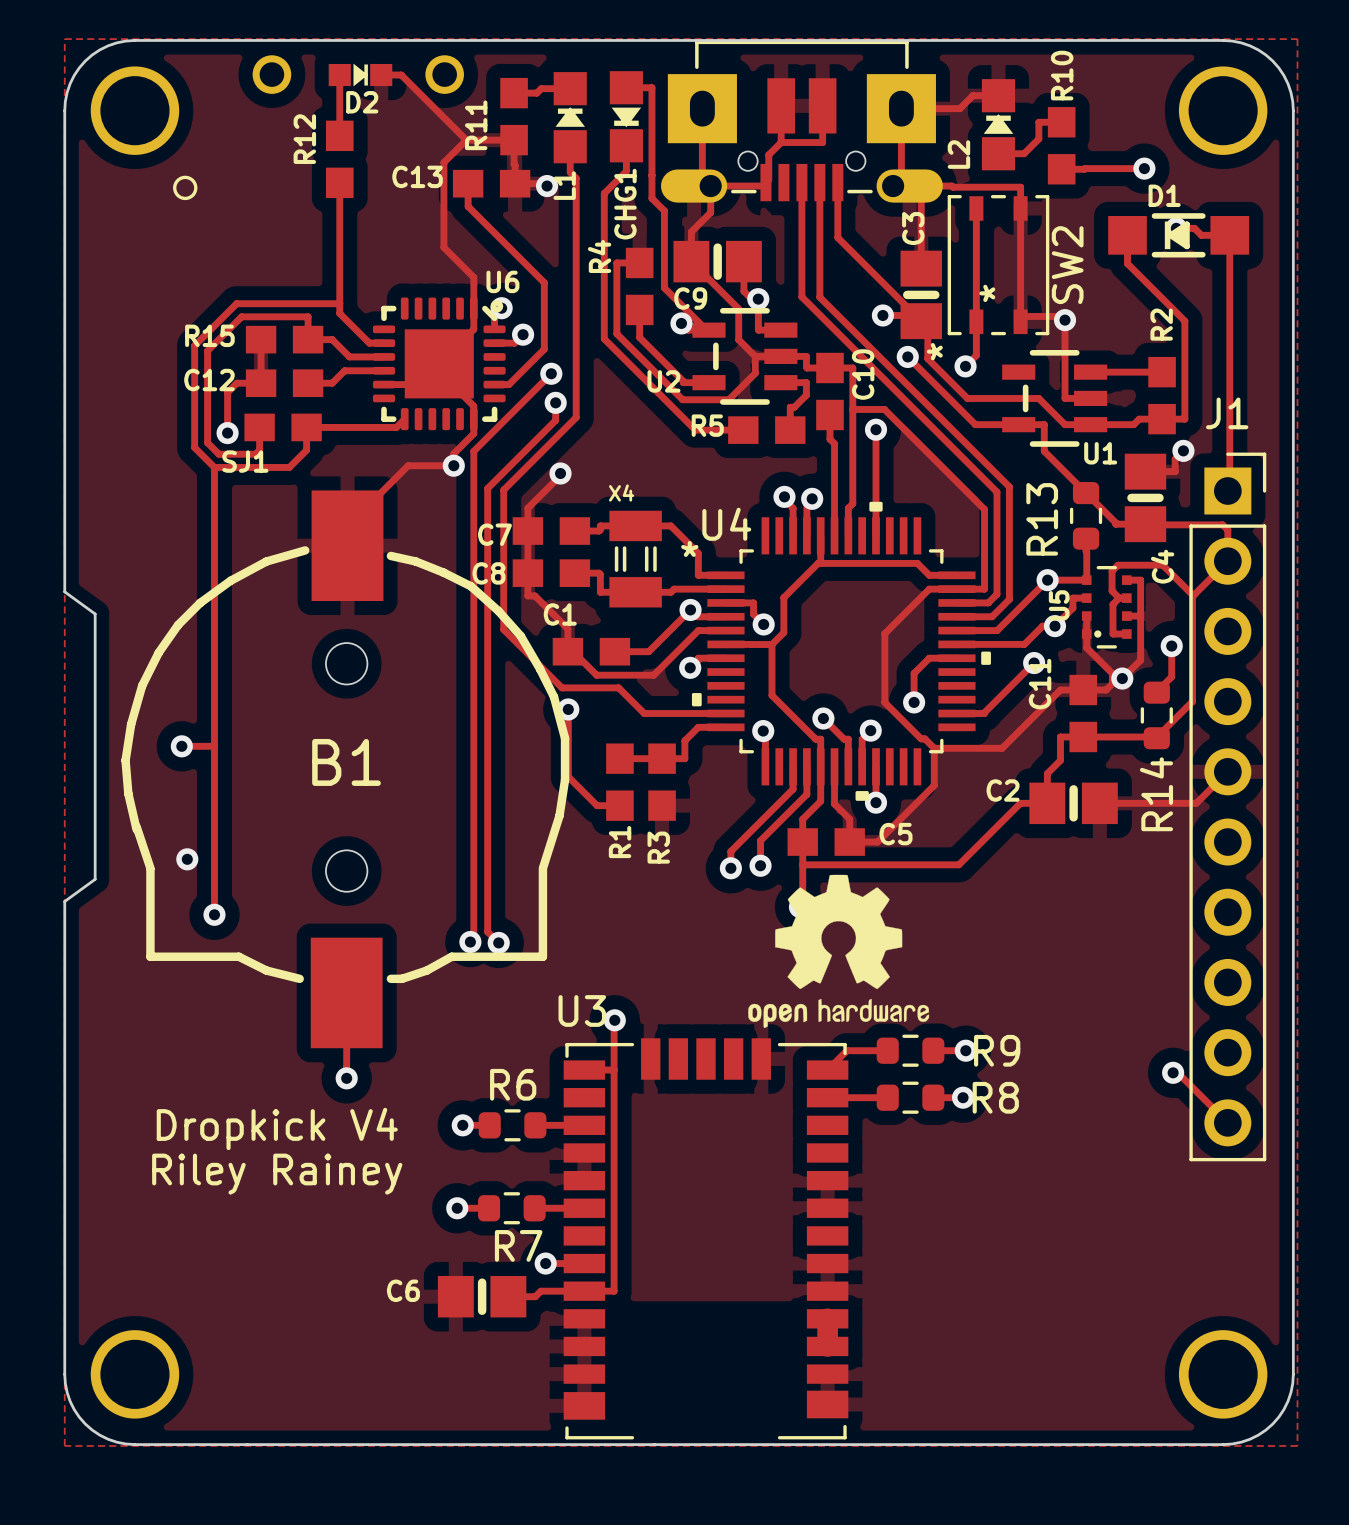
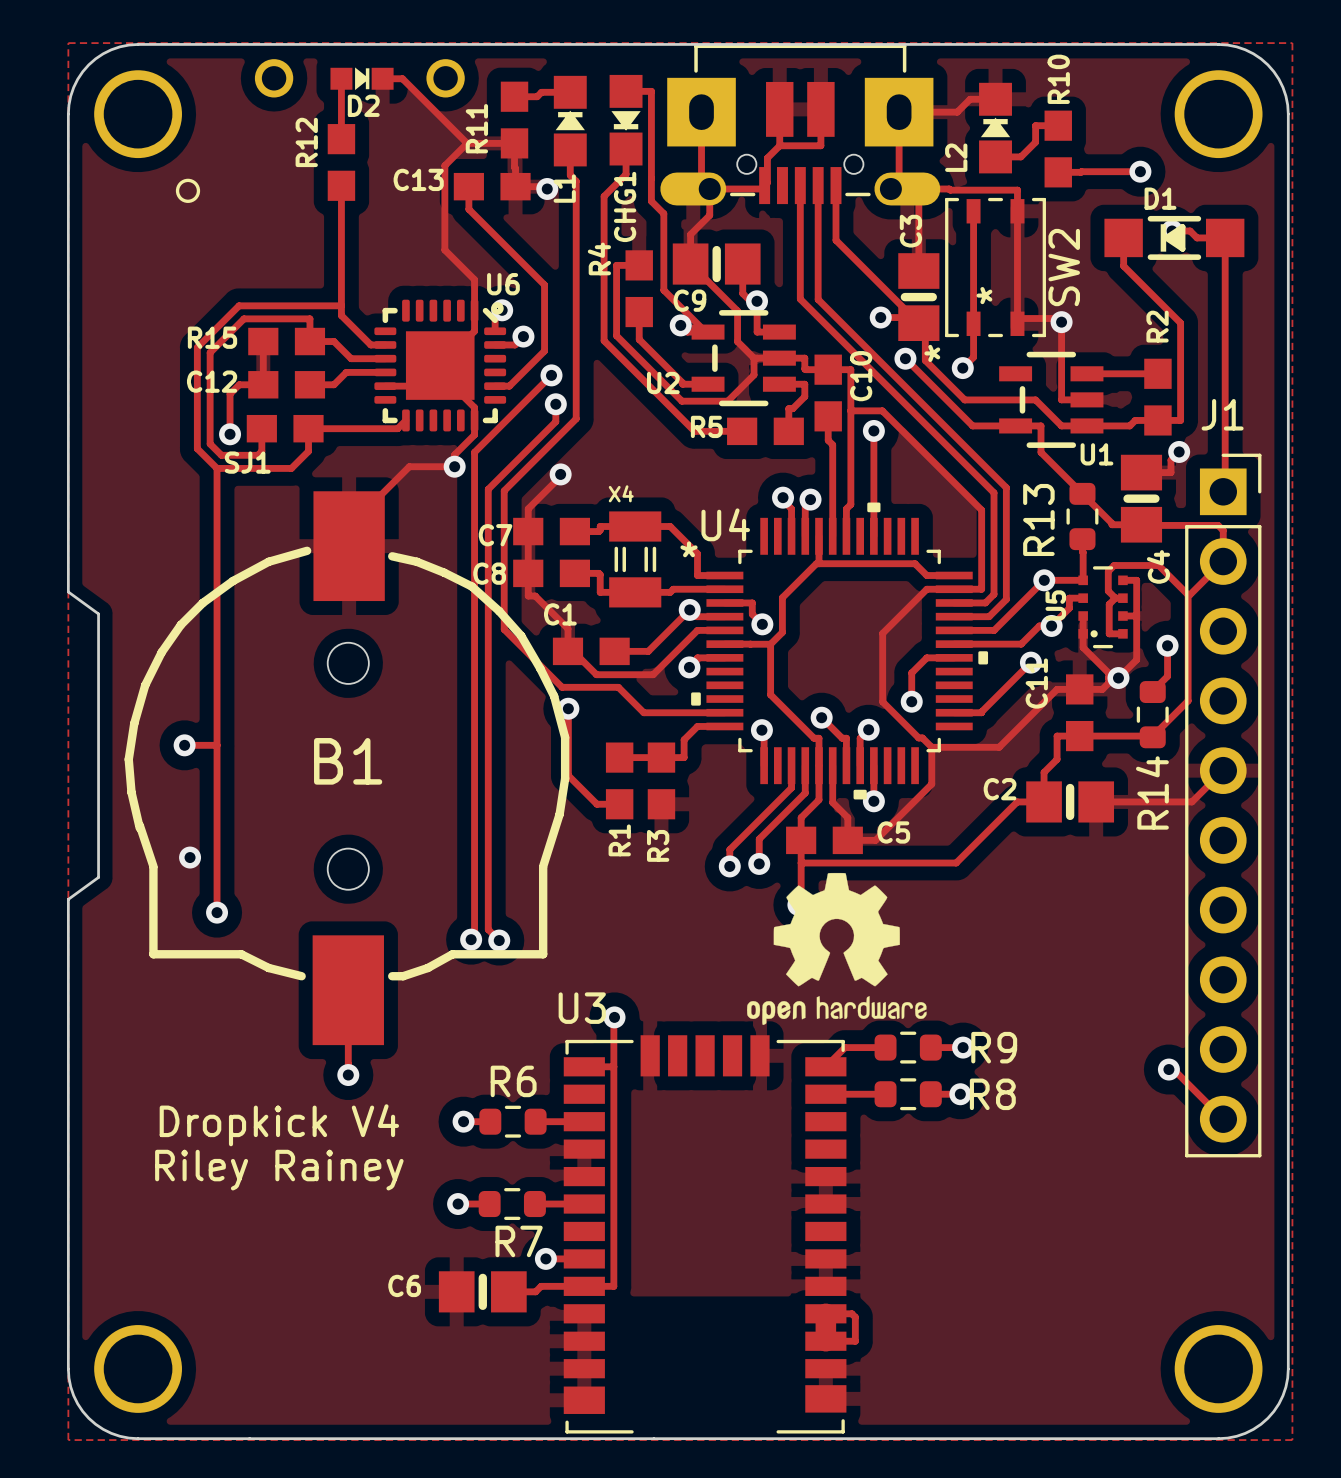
track: none -> (825, 1313) (851, 1313) (855, 1317) (855, 1341) (825, 1341)

